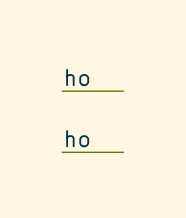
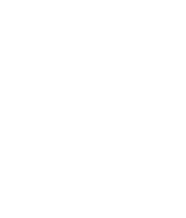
label: ho (77, 77) -> none
wire: (62, 91) (123, 91) -> none
label: ho (77, 138) -> none
wire: (62, 152) (123, 152) -> none

